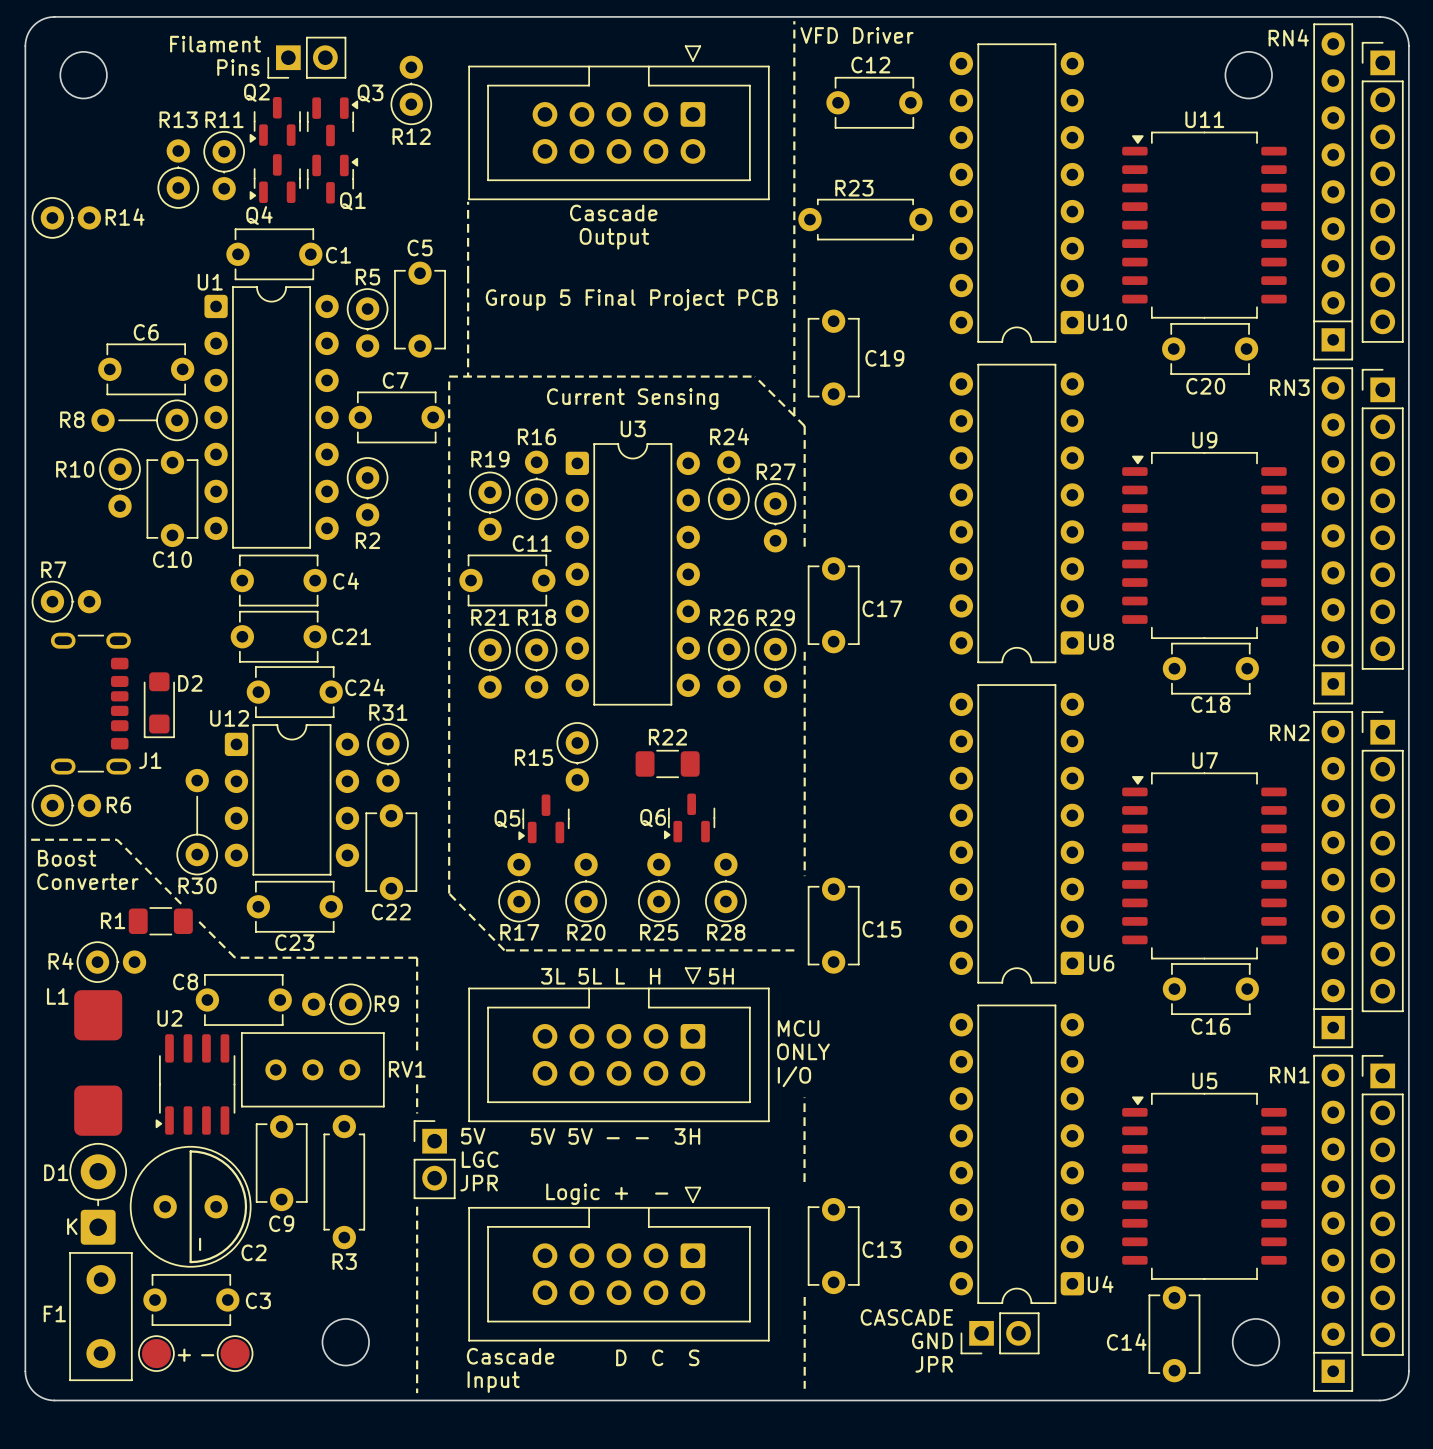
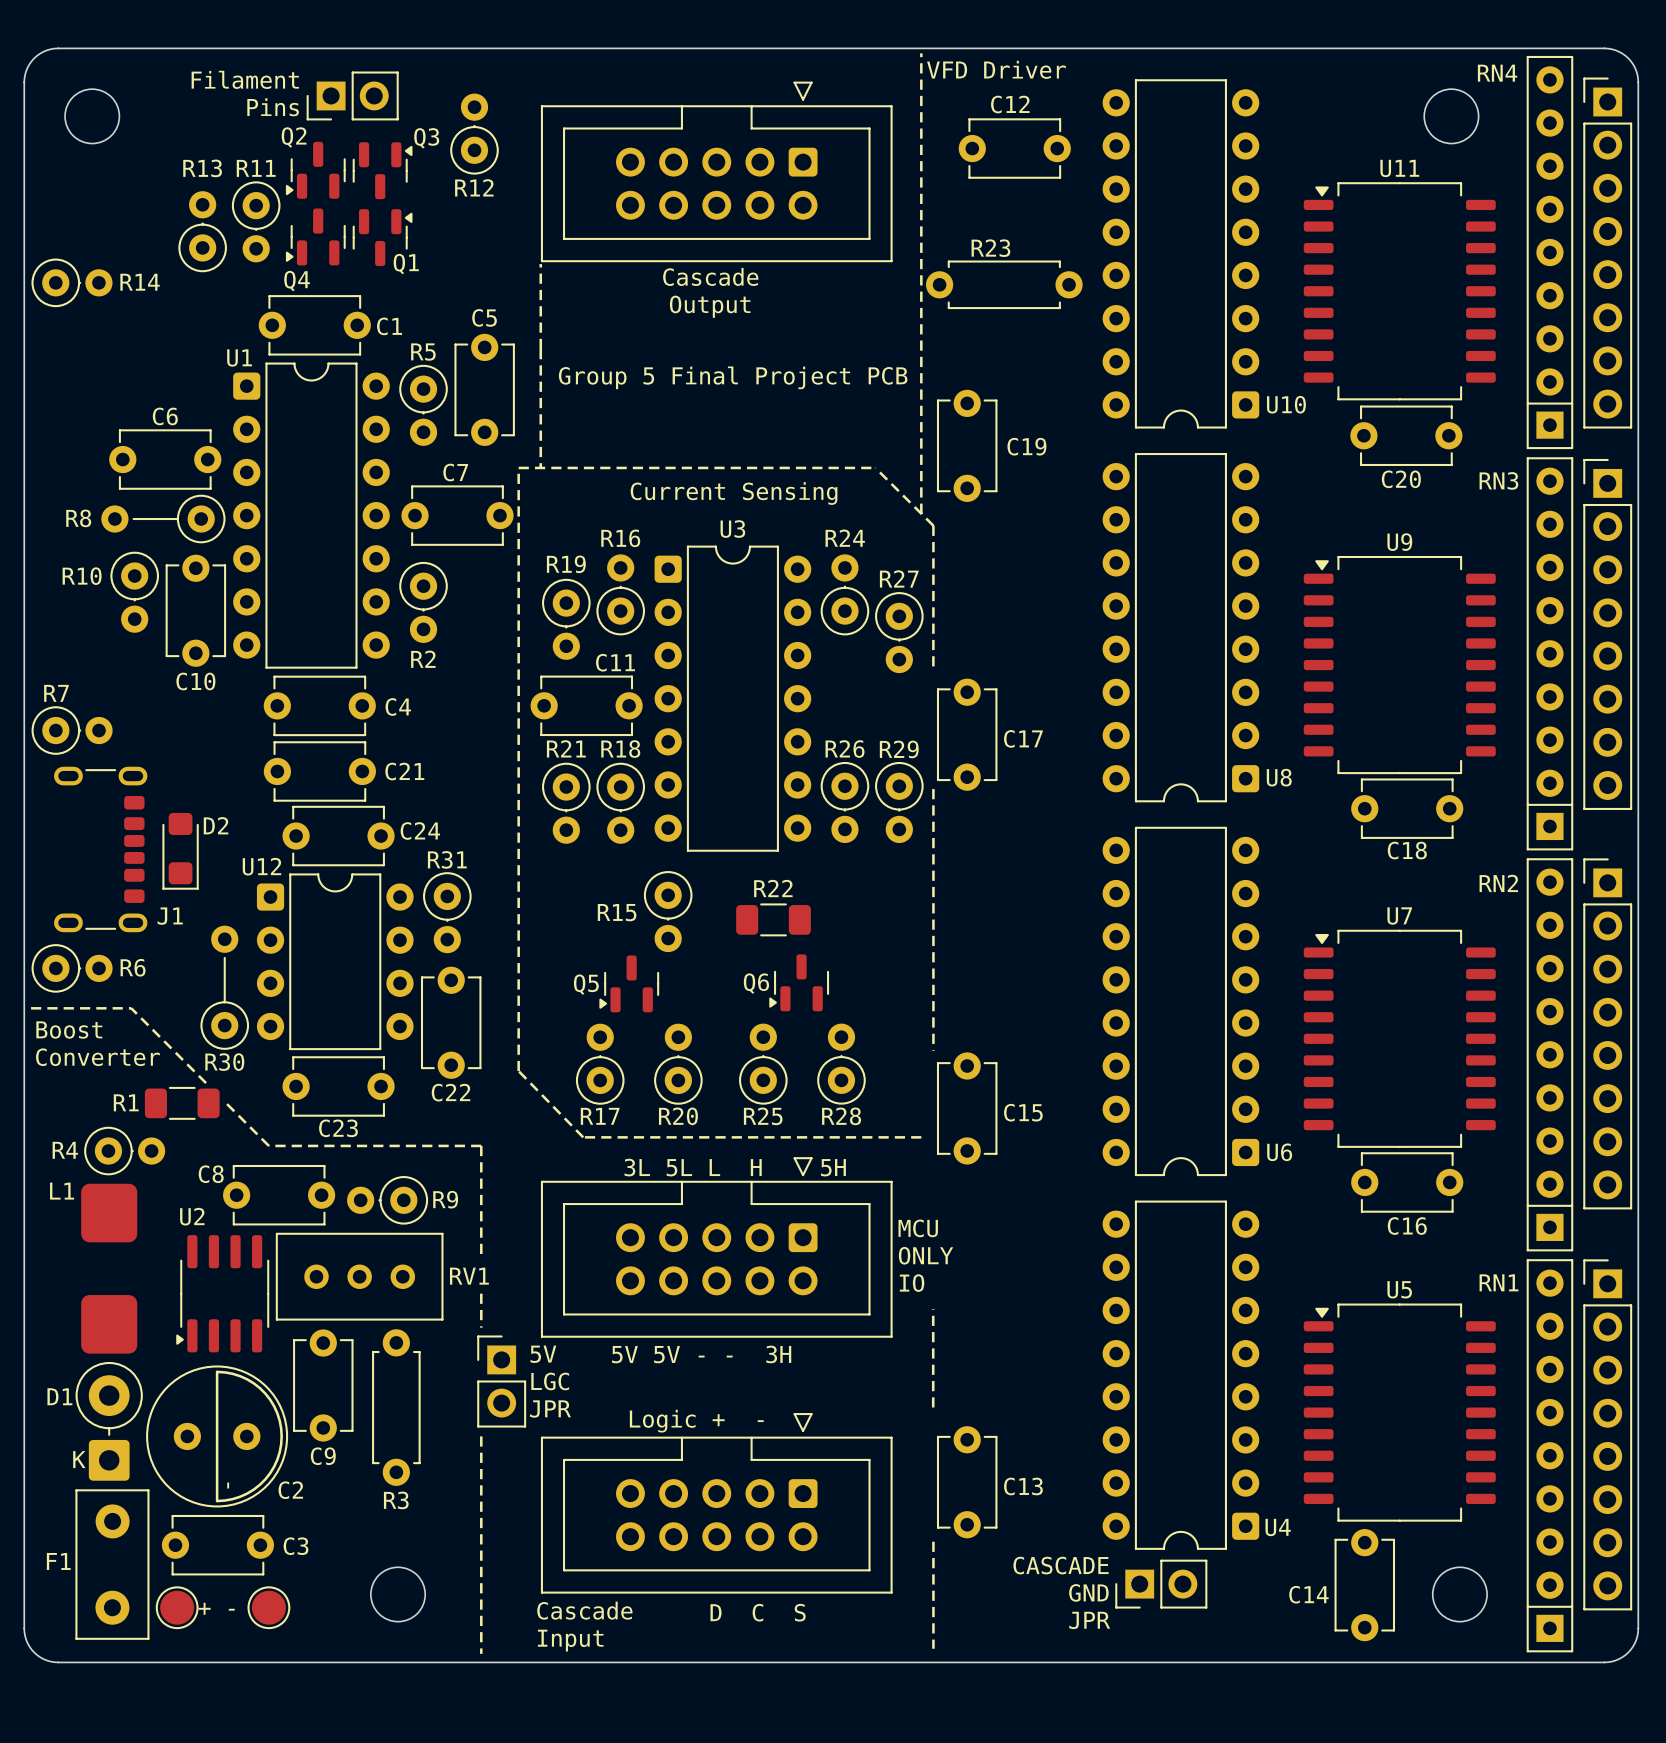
text: I/O (794, 1076) -> IO (912, 1283)

